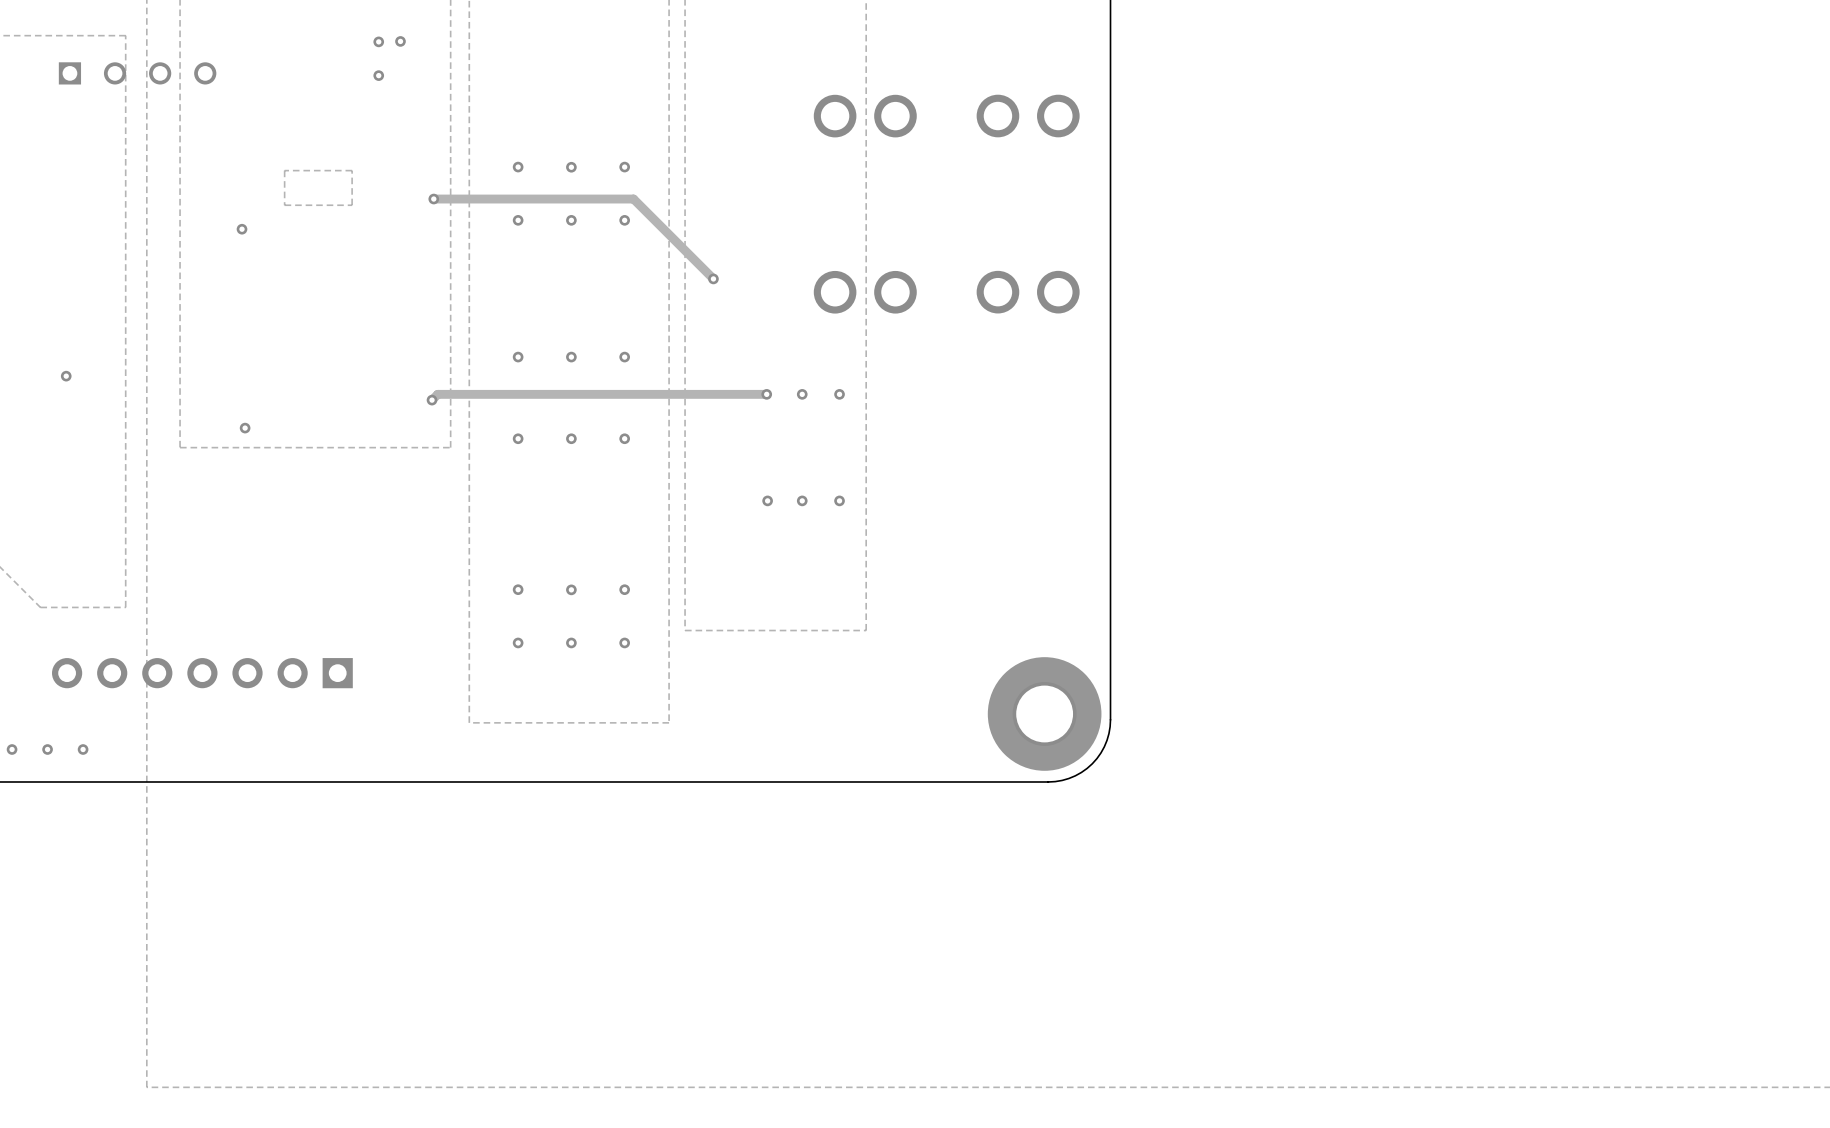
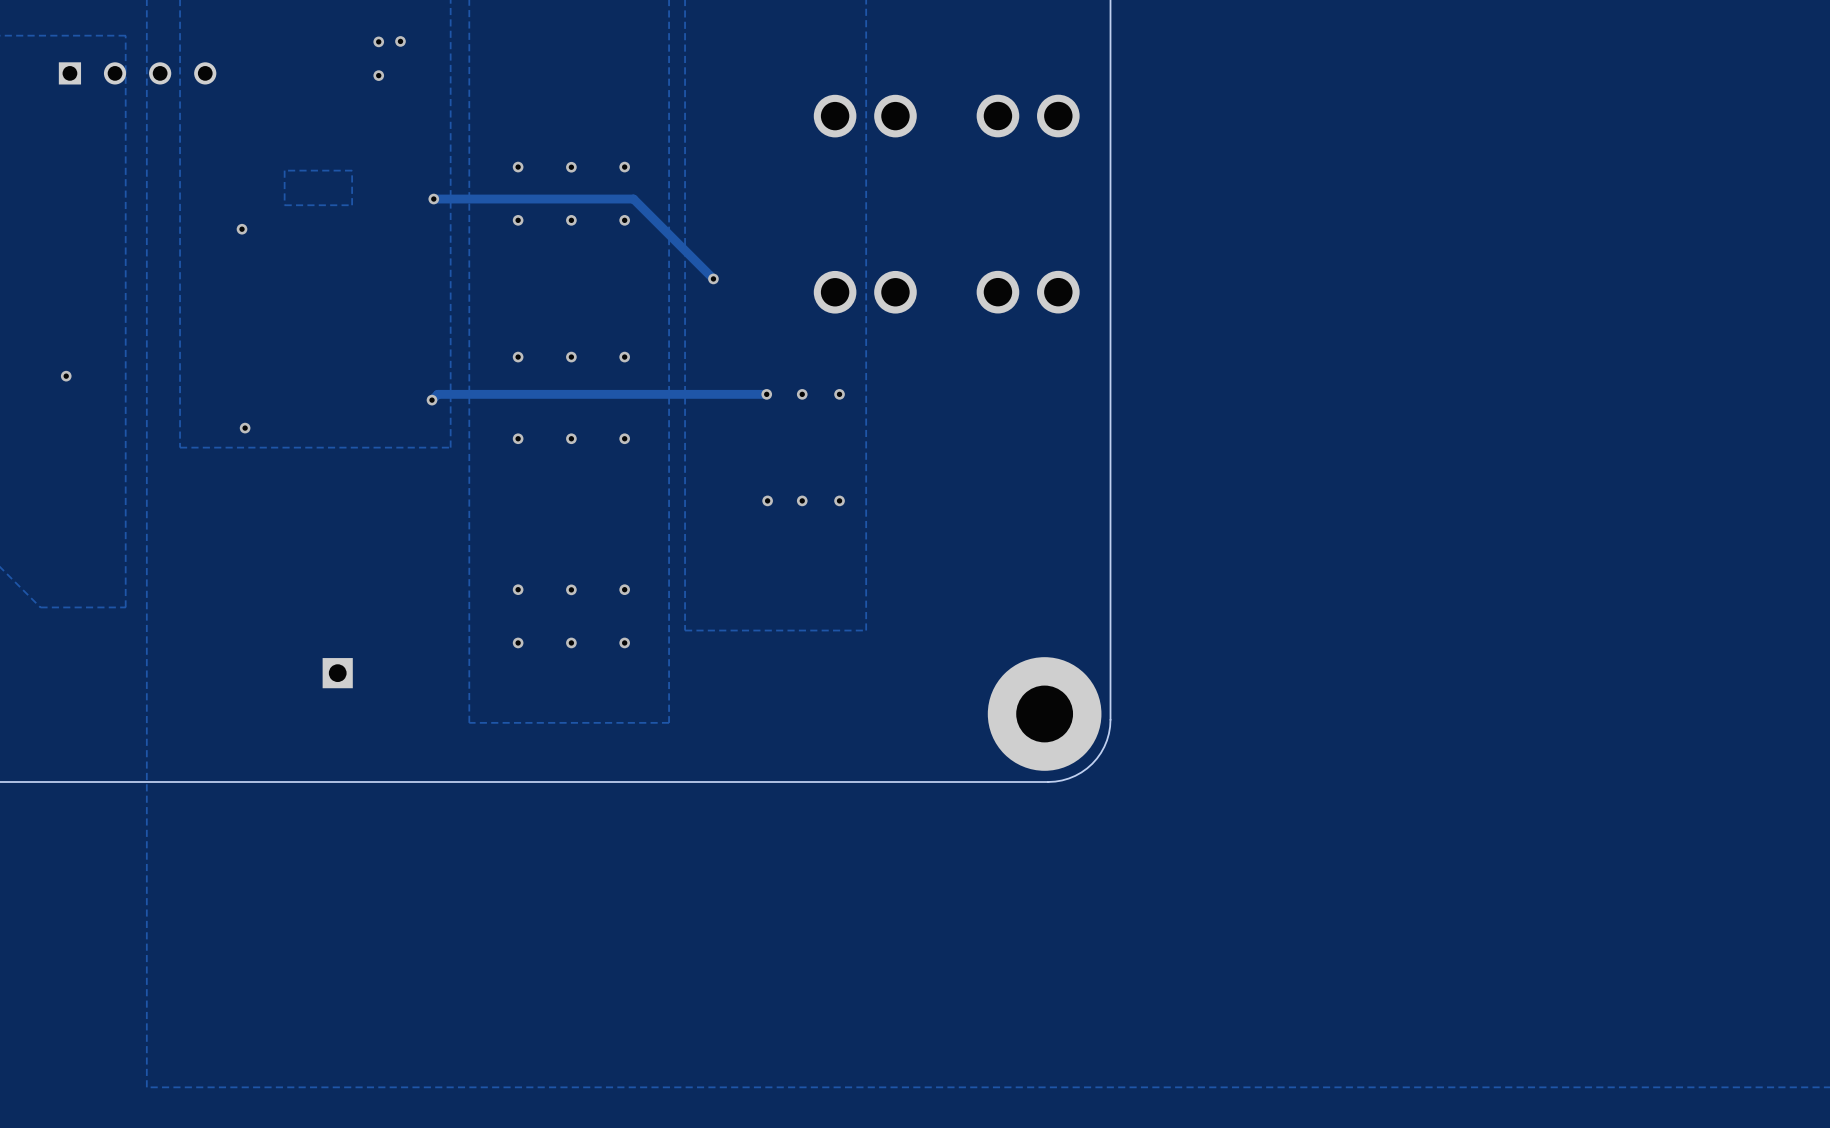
part: (202, 673) -> none
via: (12, 749) -> none
via: (47, 749) -> none
via: (83, 749) -> none

